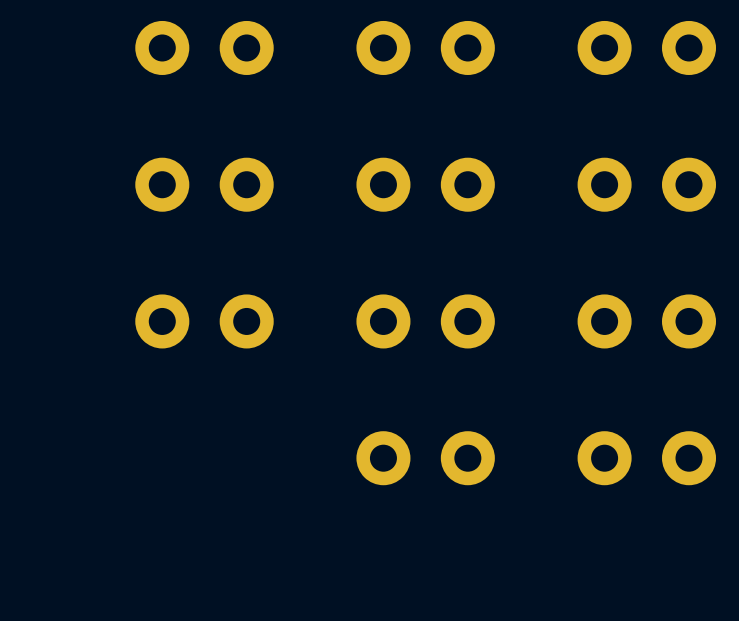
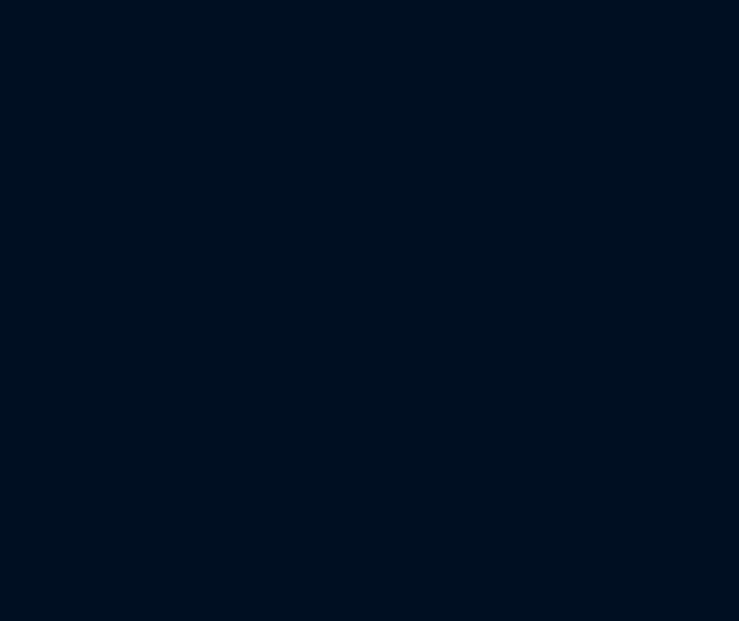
part: (204, 47) -> none
part: (425, 47) -> none
part: (646, 47) -> none
part: (204, 184) -> none
part: (425, 184) -> none
part: (646, 184) -> none
part: (204, 321) -> none
part: (425, 321) -> none
part: (646, 321) -> none
part: (425, 458) -> none
part: (646, 458) -> none

